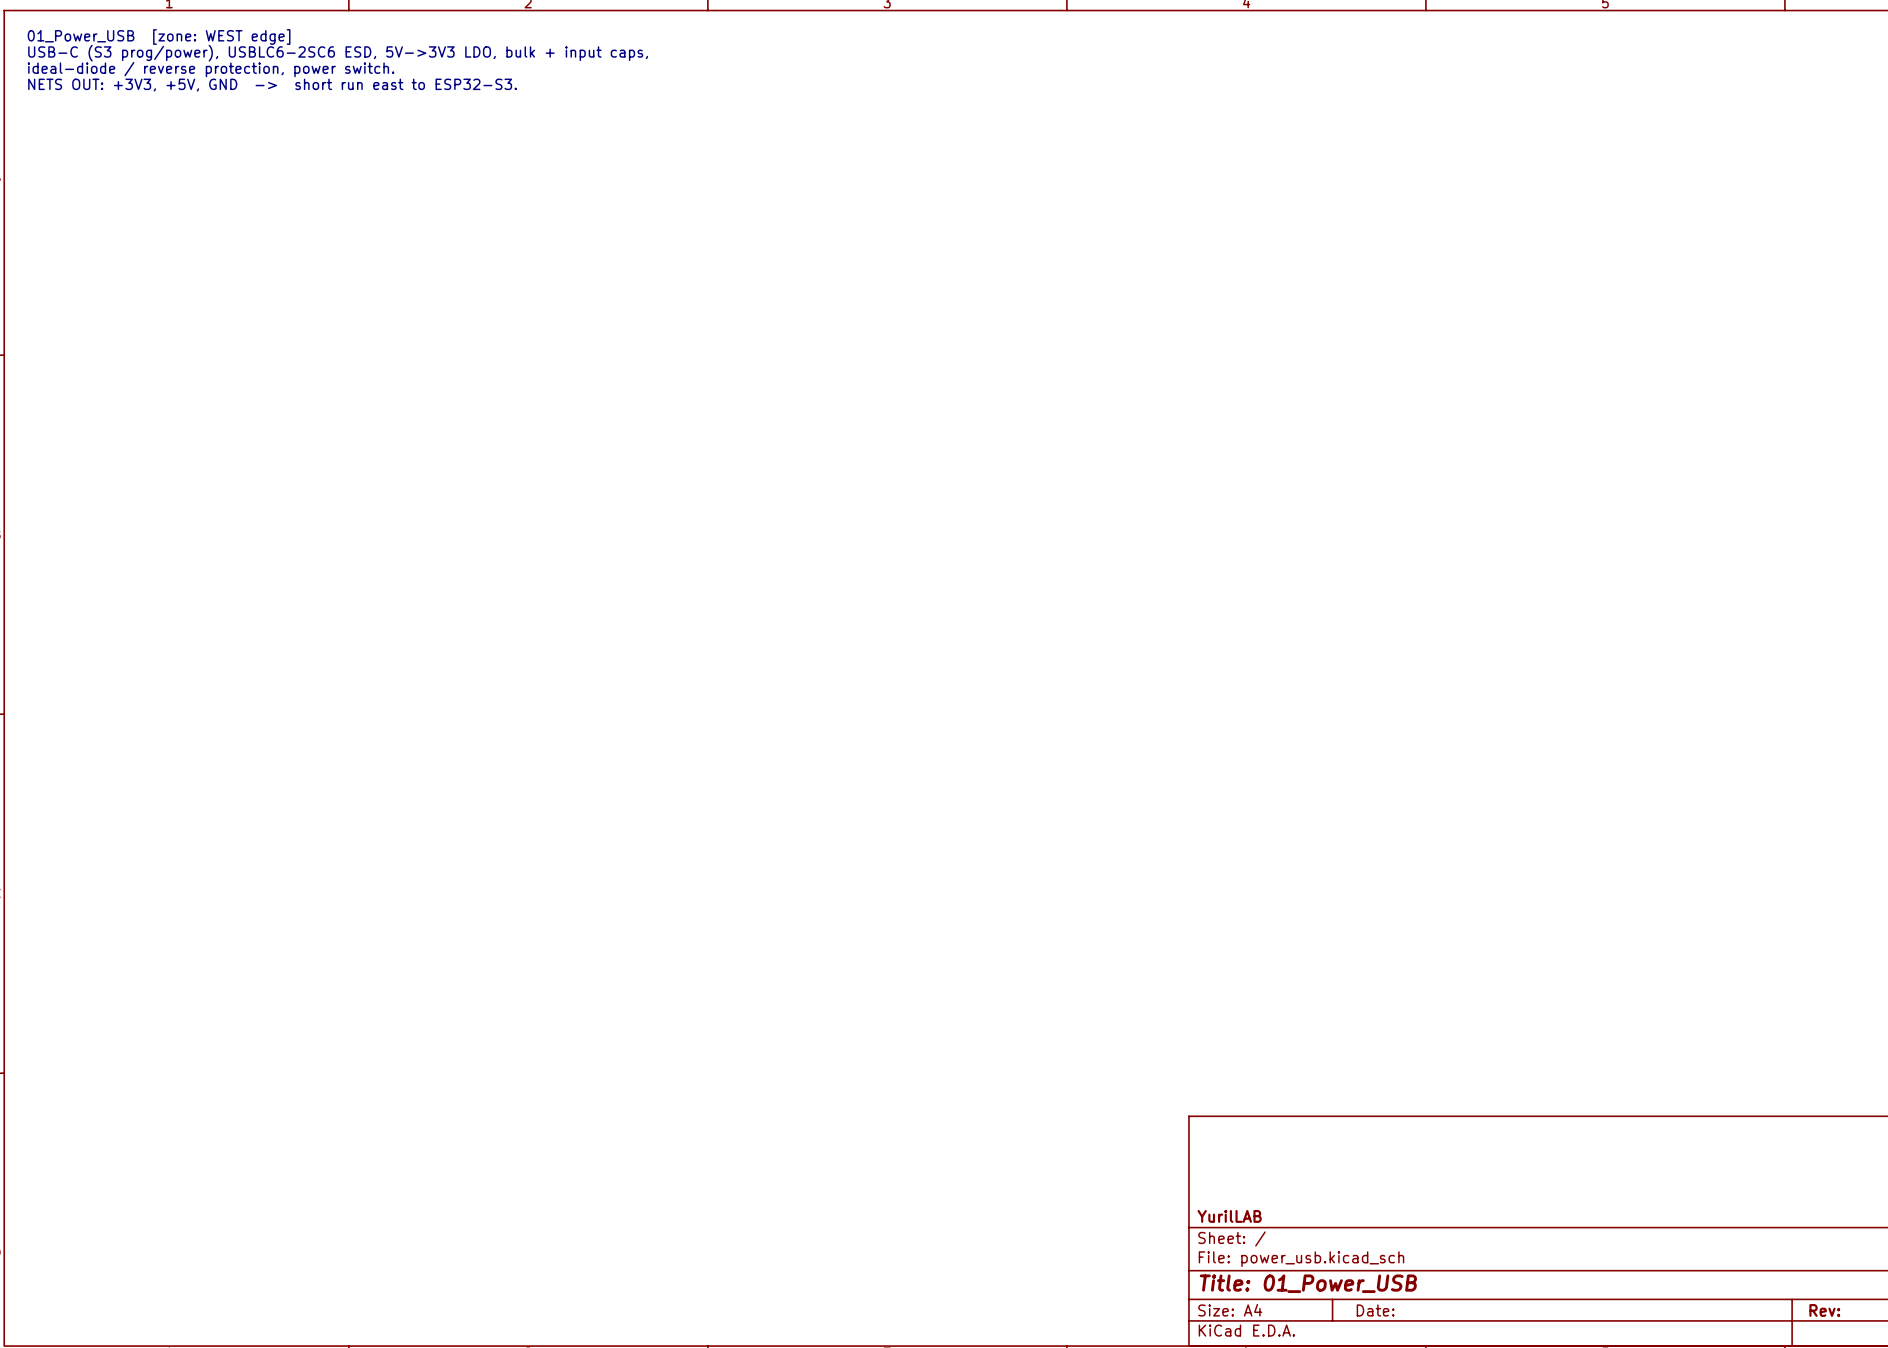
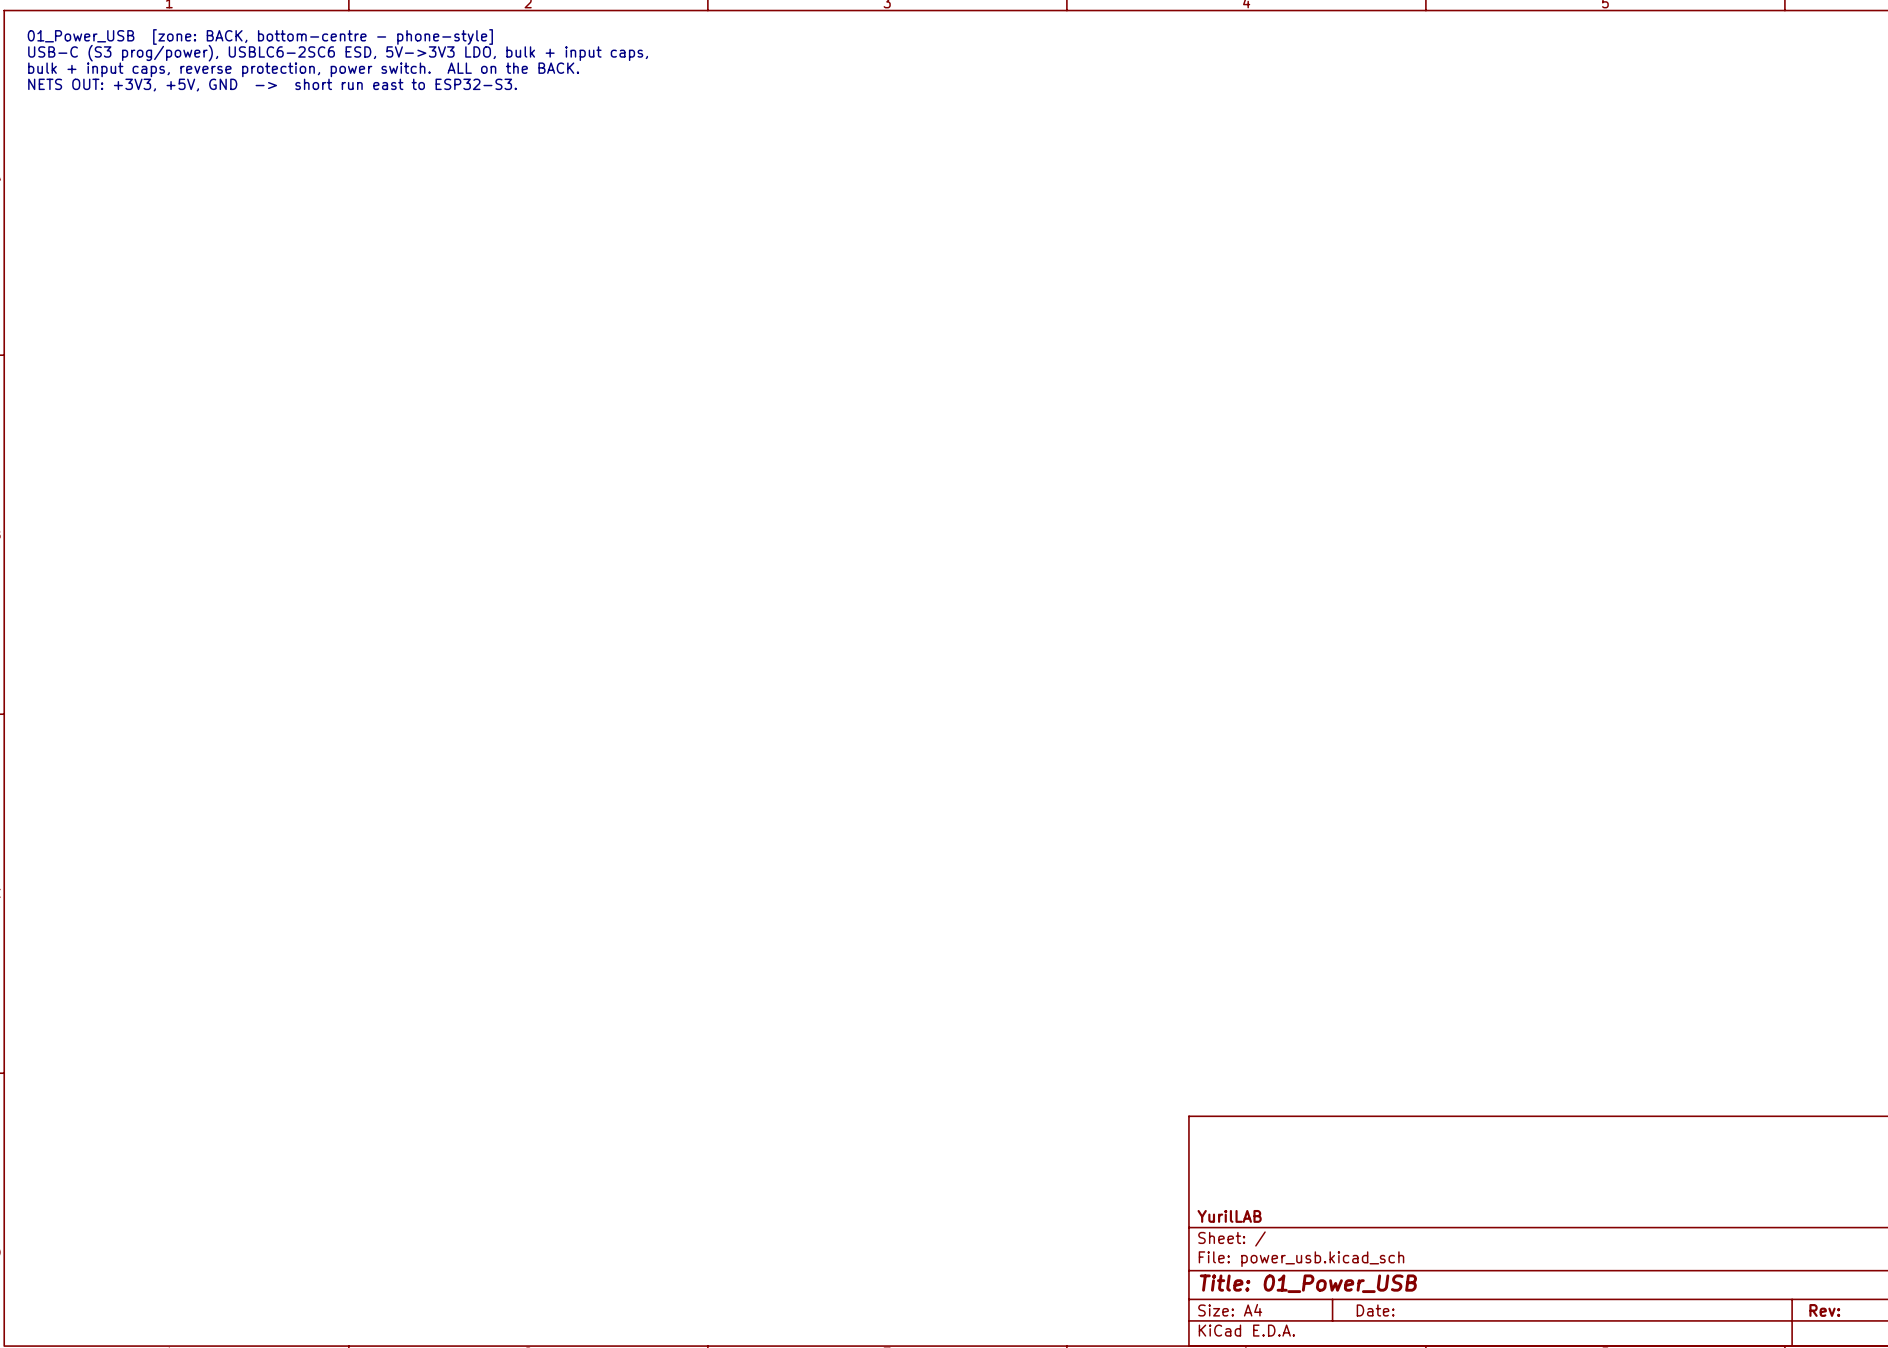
text: 01_Power_USB [zone: WEST edge] (159, 36) -> 01_Power_USB [zone: BACK, bottom-centre - phone-style] (260, 36)
text: ideal-diode / reverse protection, power switch. (211, 69) -> bulk + input caps, reverse protection, power switch. ALL on the BACK. (303, 69)

